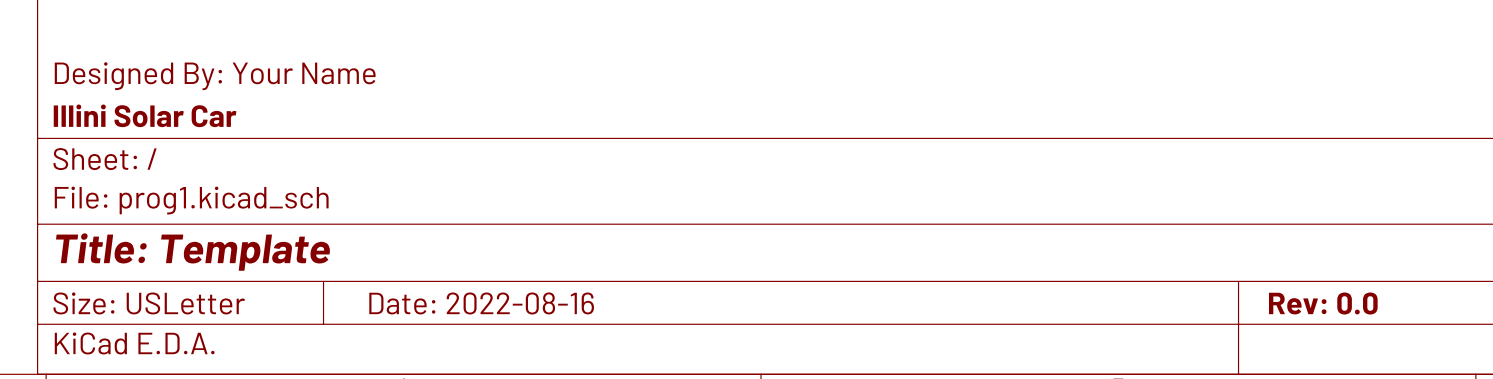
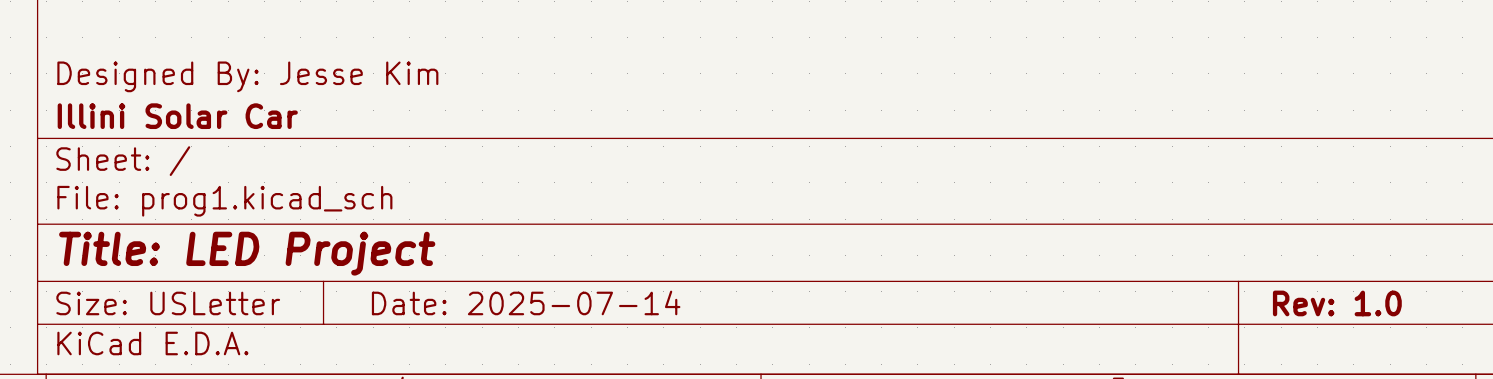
title block: Designed By: Your Name (215, 76) -> Designed By: Jesse Kim (247, 76)
title block: Title: Template (192, 252) -> Title: LED Project (247, 253)
title block: Date: 2022-08-16 (481, 303) -> Date: 2025-07-14 (526, 302)
title block: Rev: 0.0 (1323, 303) -> Rev: 1.0 (1337, 303)

